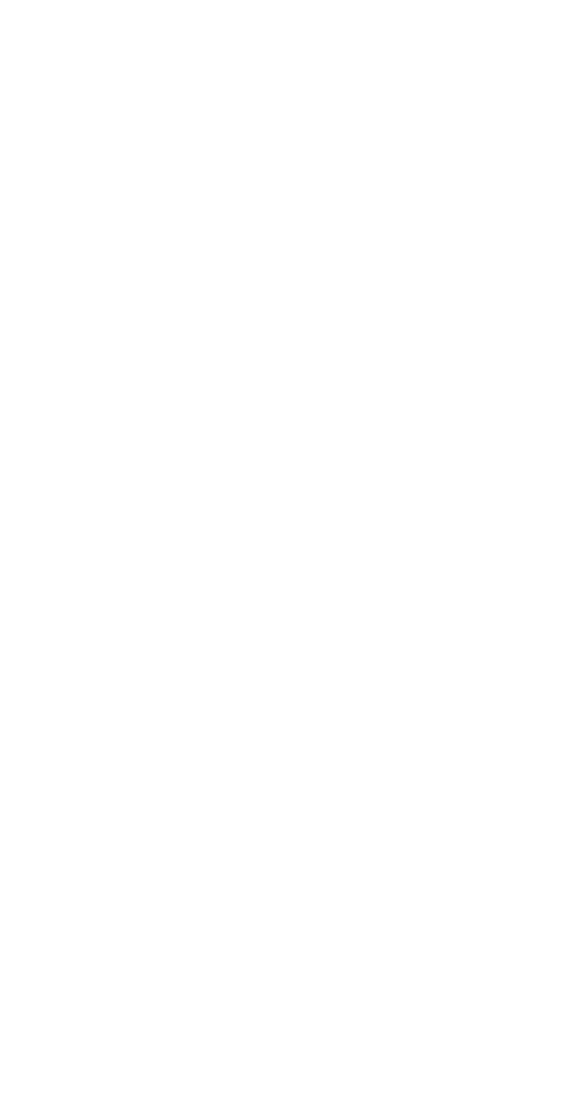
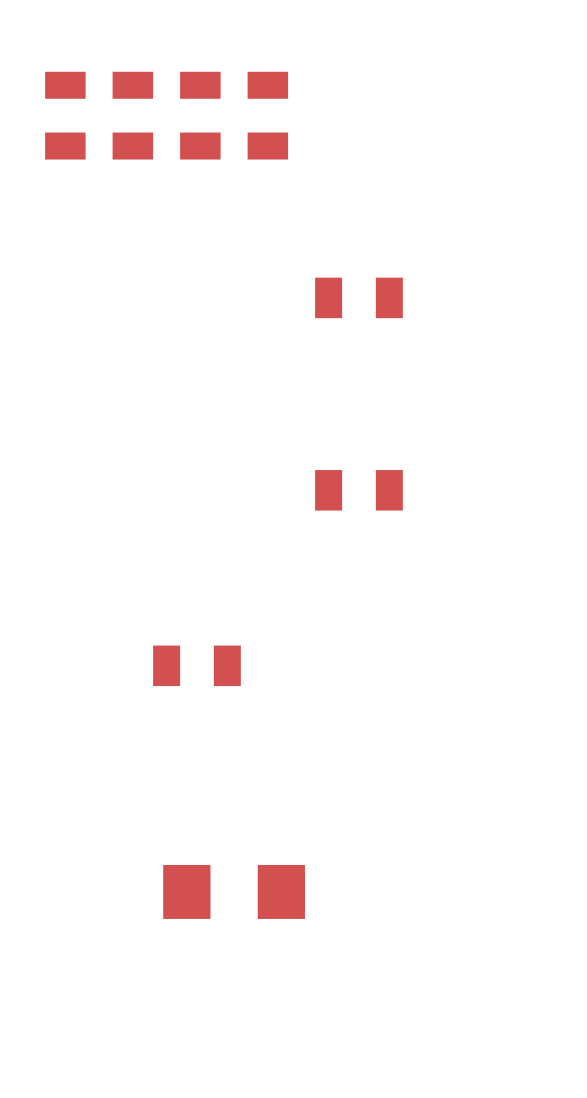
part: none -> (65, 115)
part: none -> (132, 115)
part: none -> (200, 115)
part: none -> (267, 115)
part: none -> (358, 297)
part: none -> (358, 490)
part: none -> (196, 665)
part: none -> (234, 891)

